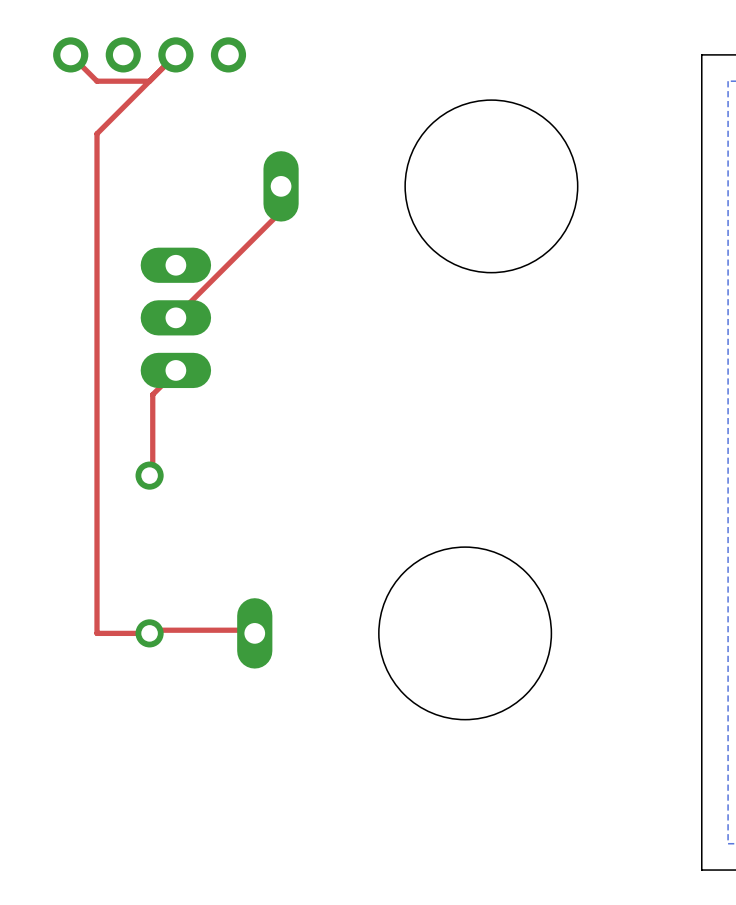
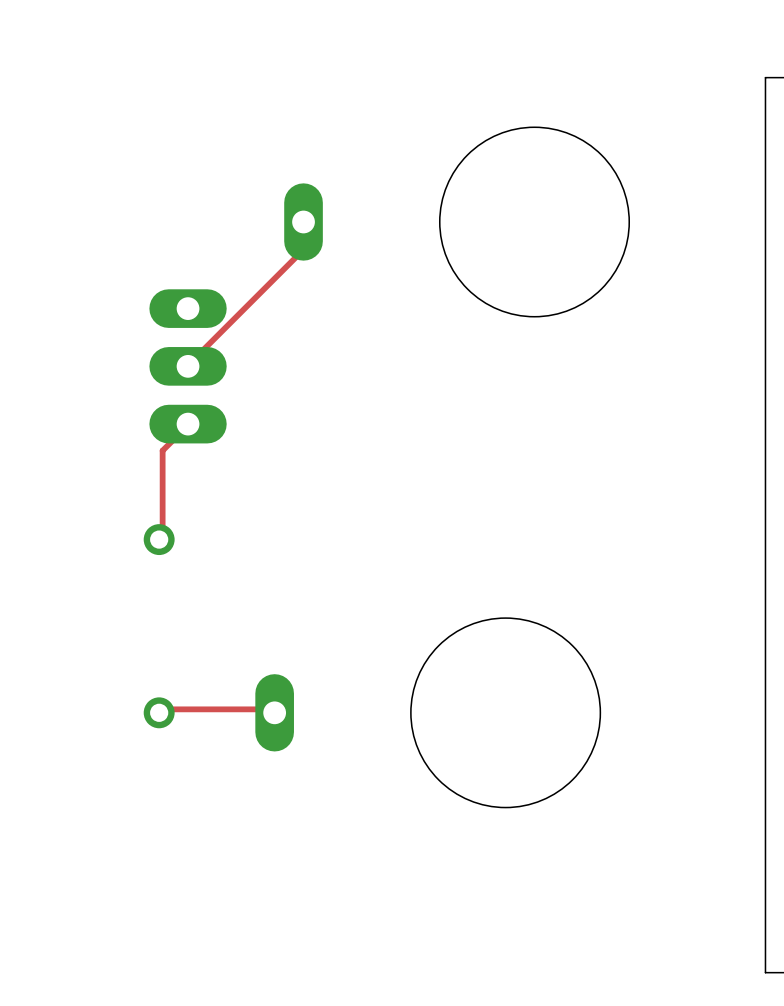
top track: (70, 54) (97, 81) (149, 81) -> none
part: (149, 54) -> none
top track: (175, 54) (97, 133) (97, 633) (149, 633) -> none

